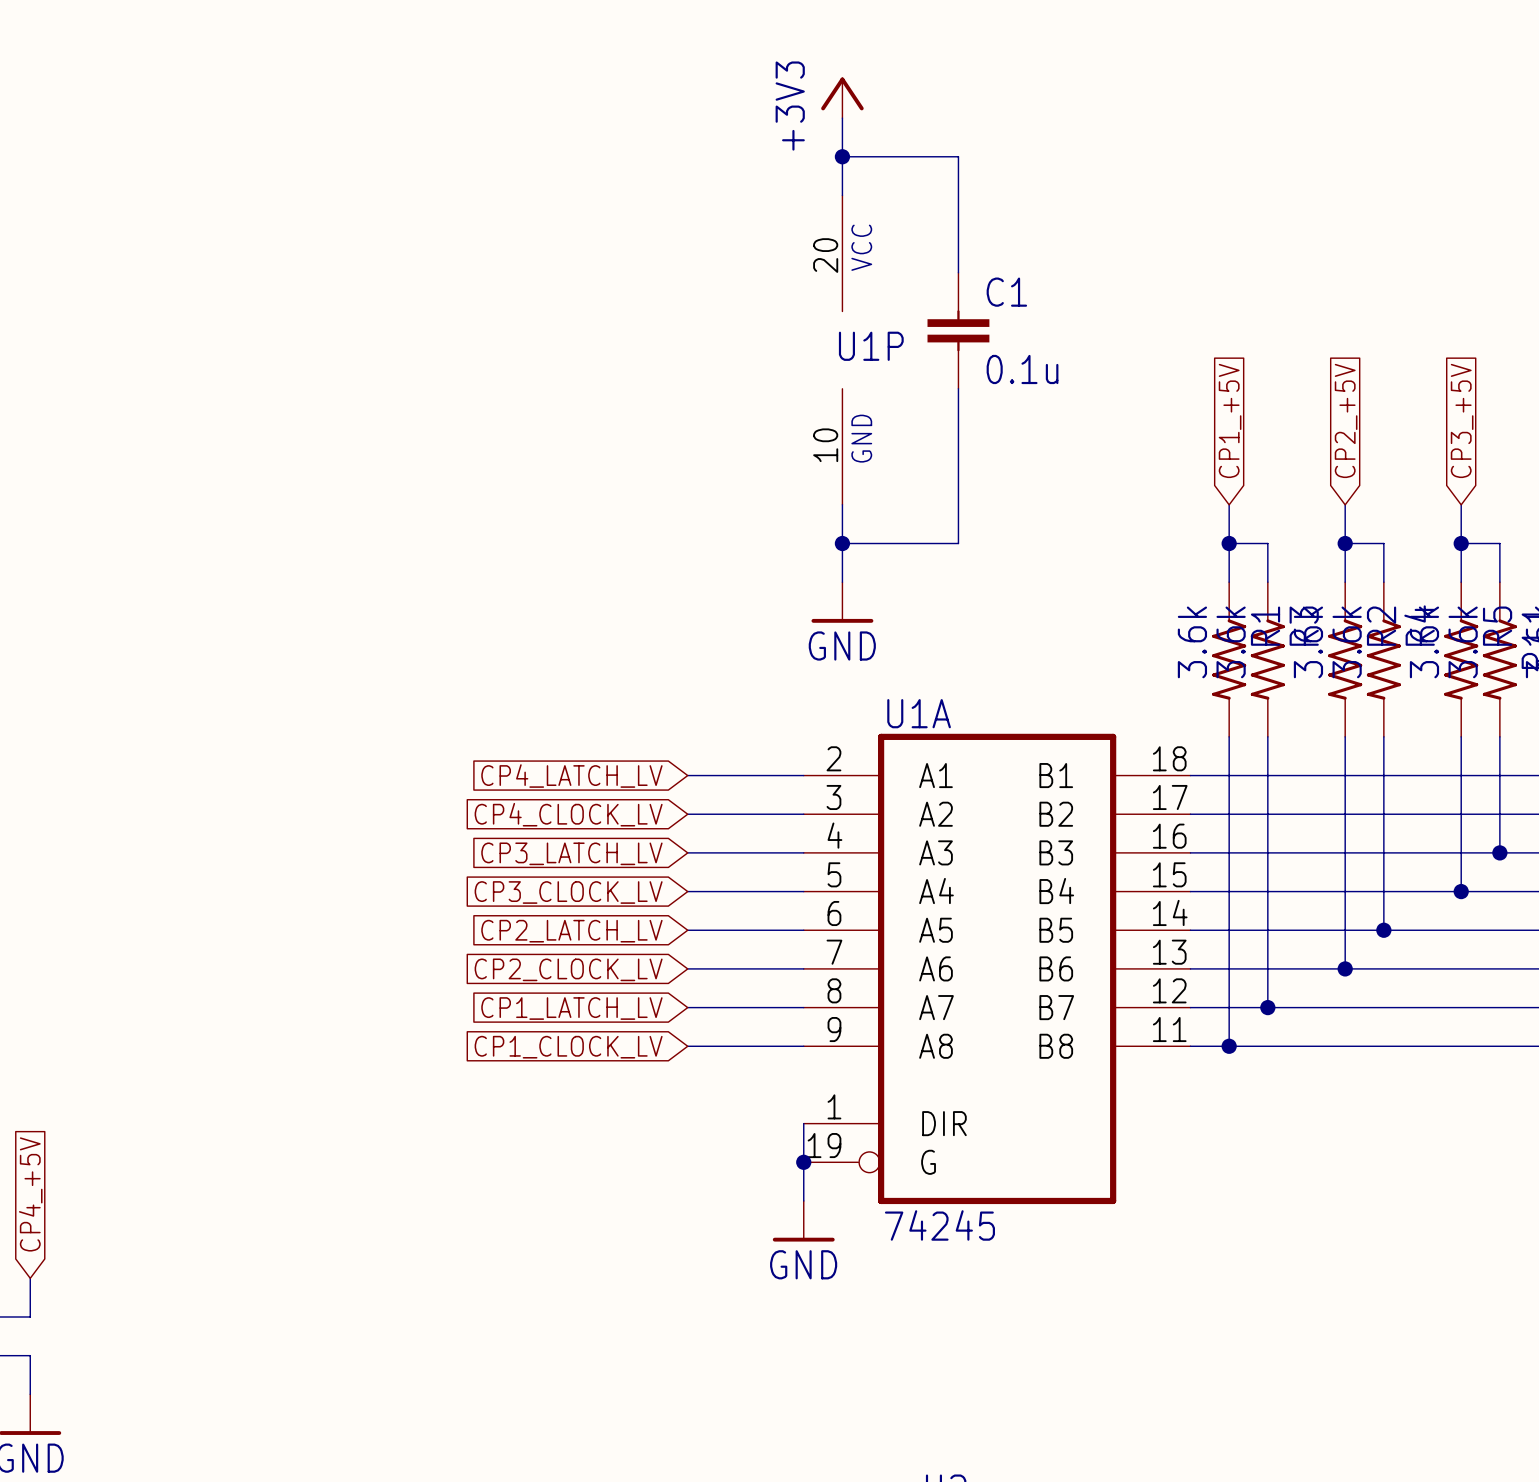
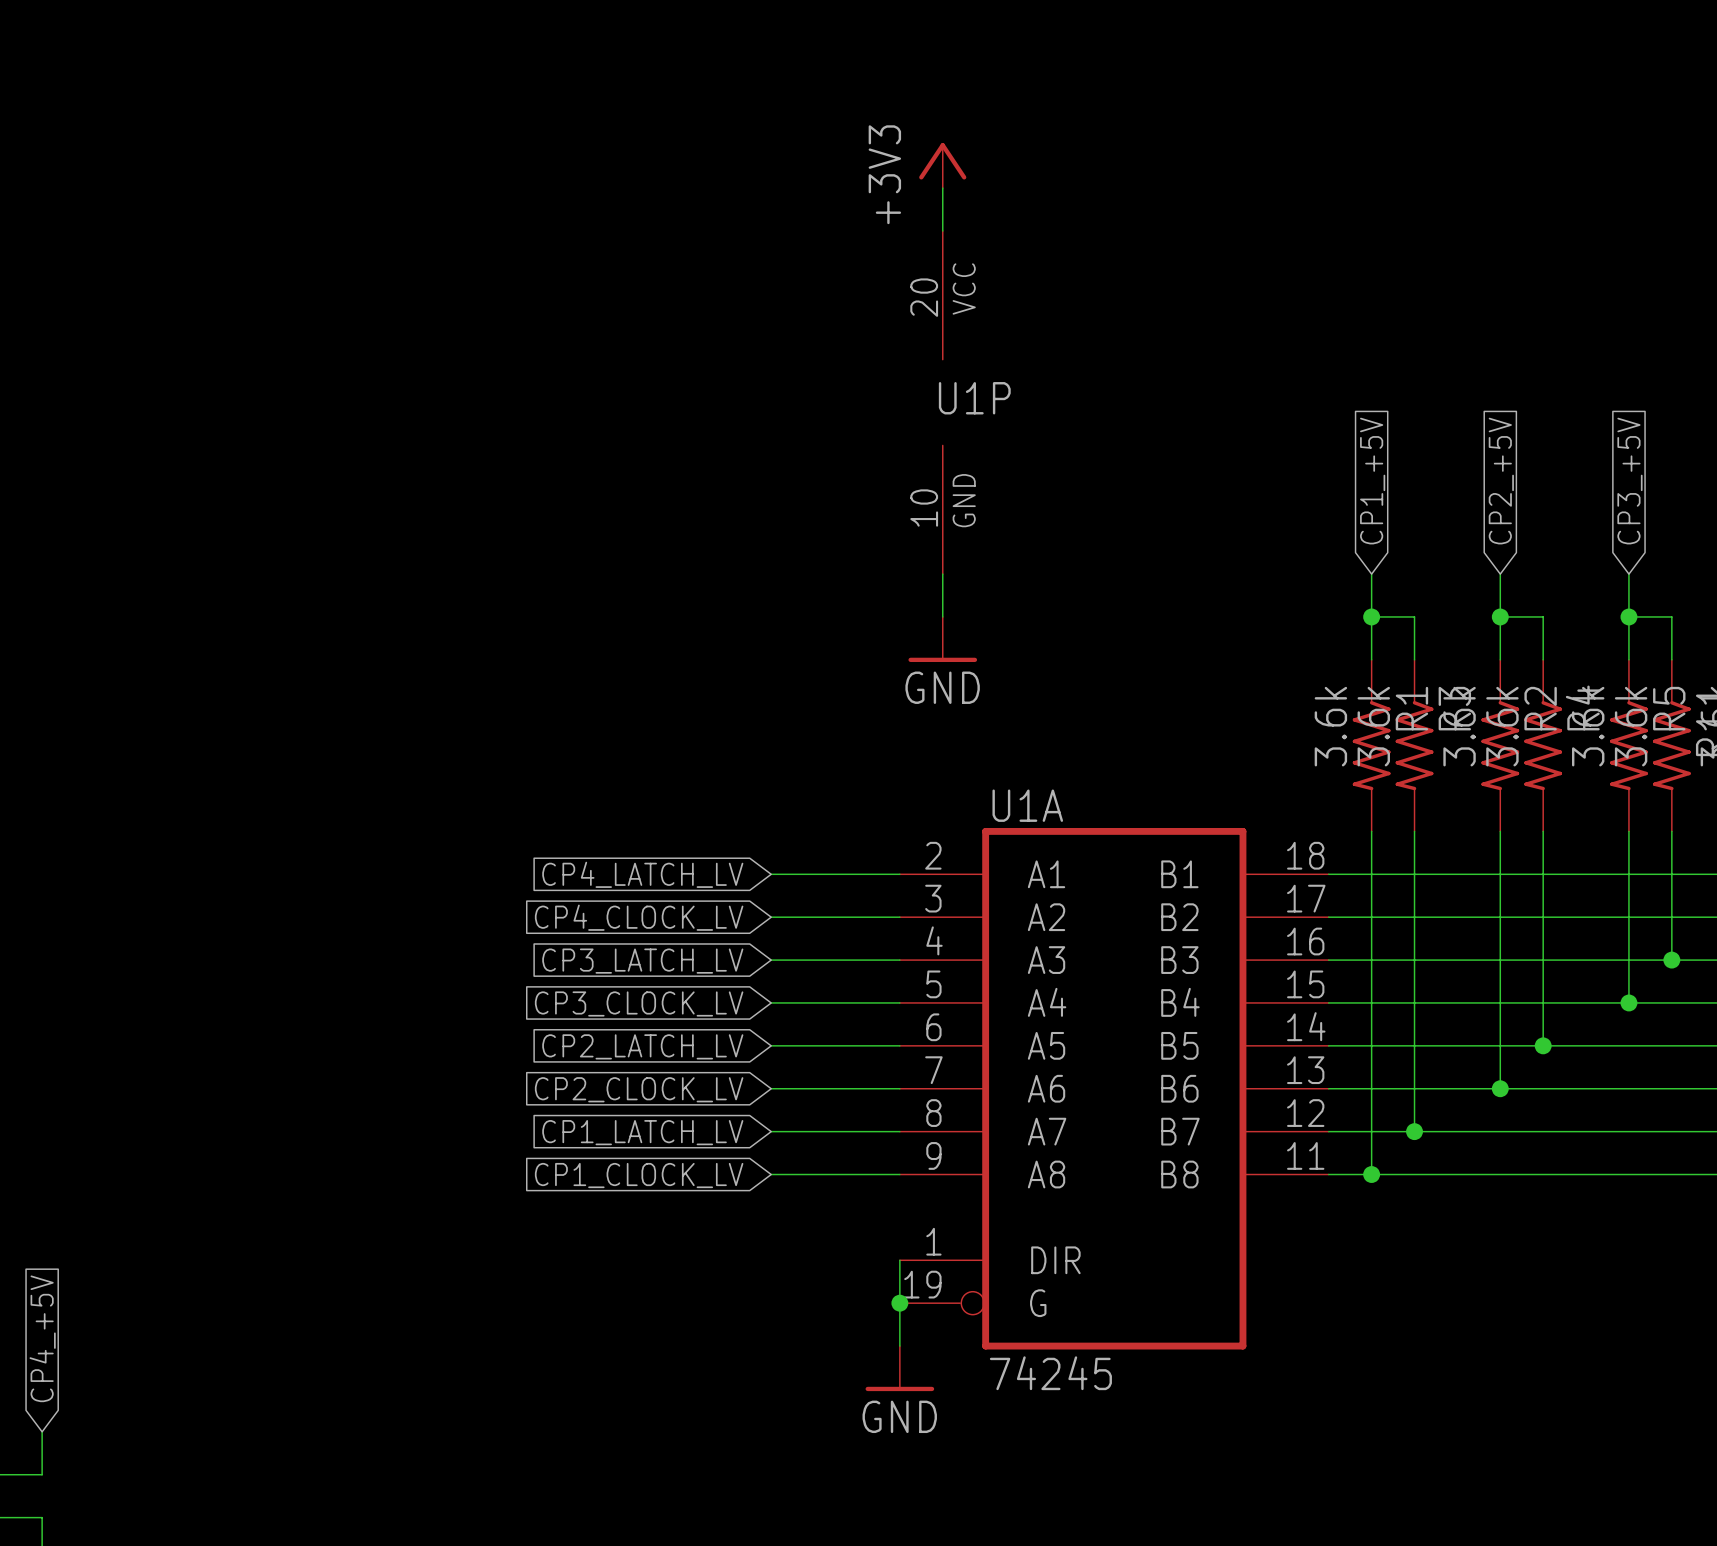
power symbol position: +3V3 (842, 97) -> +3V3 (942, 165)
wire: (842, 118) (842, 156) (958, 156) (958, 272) -> none
junction: (842, 156) -> none
C1: 0.1u (958, 330) -> none
wire: (958, 388) (958, 543) (842, 543) (842, 582) -> none
junction: (842, 543) -> none
power symbol position: GND (842, 602) -> GND (942, 639)

